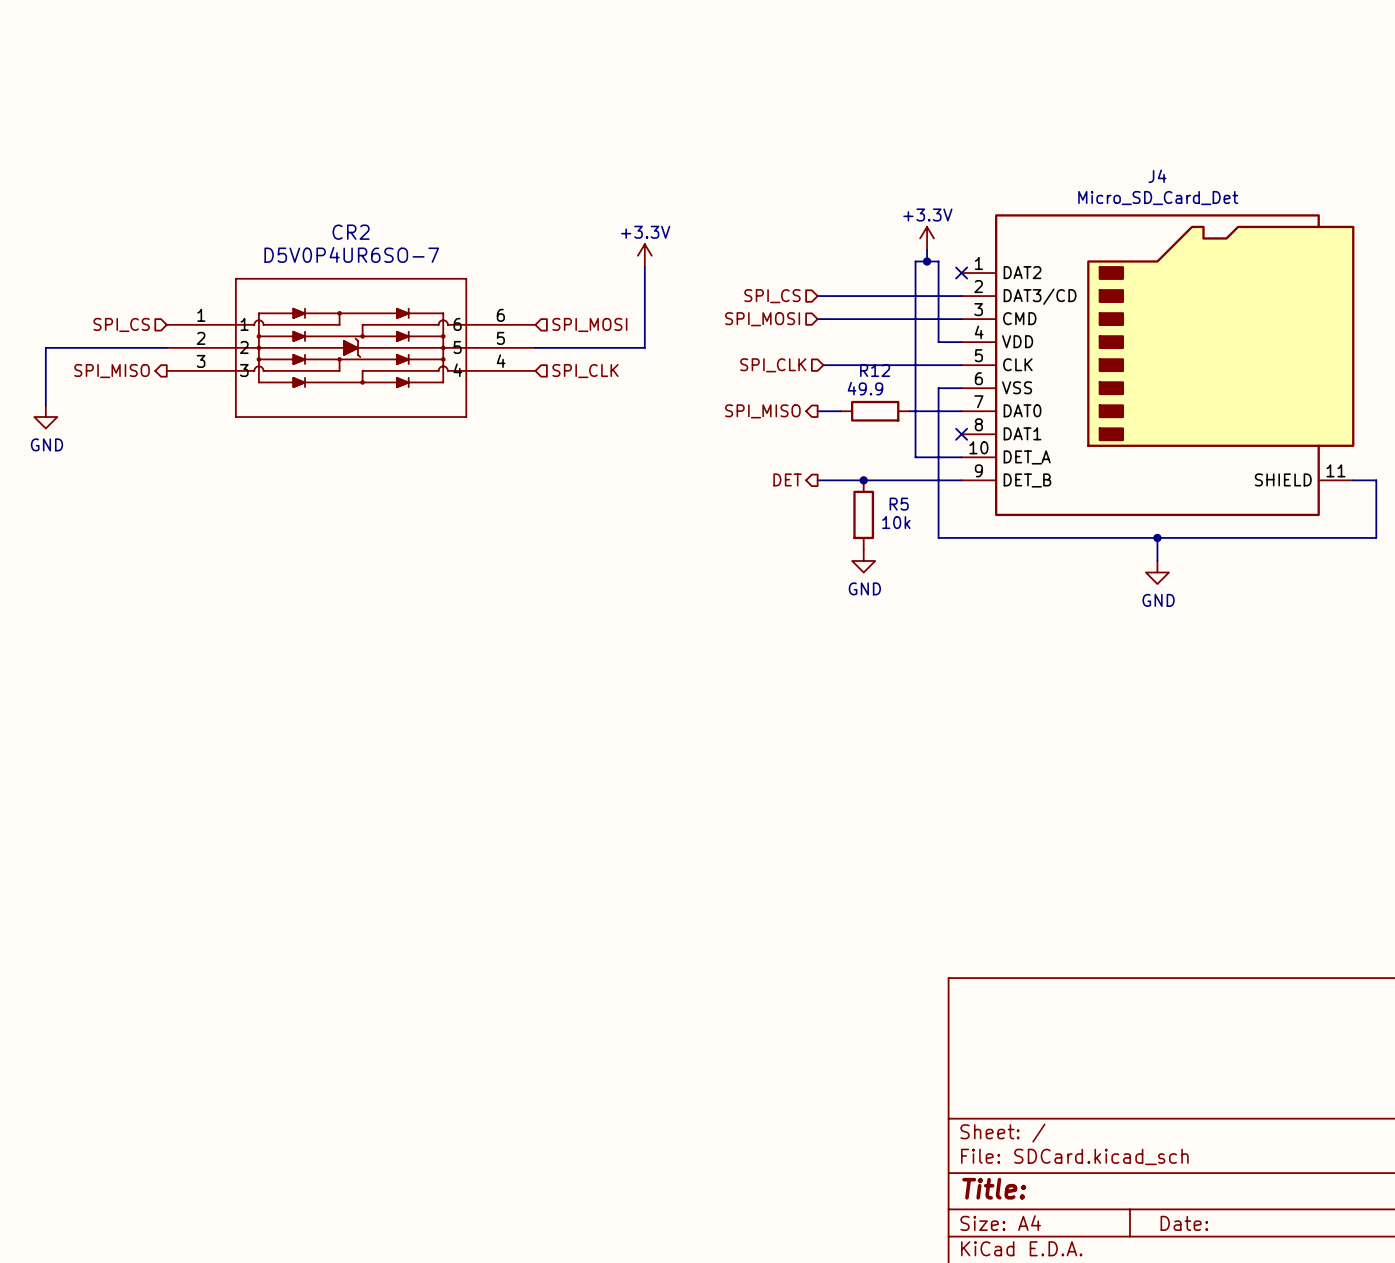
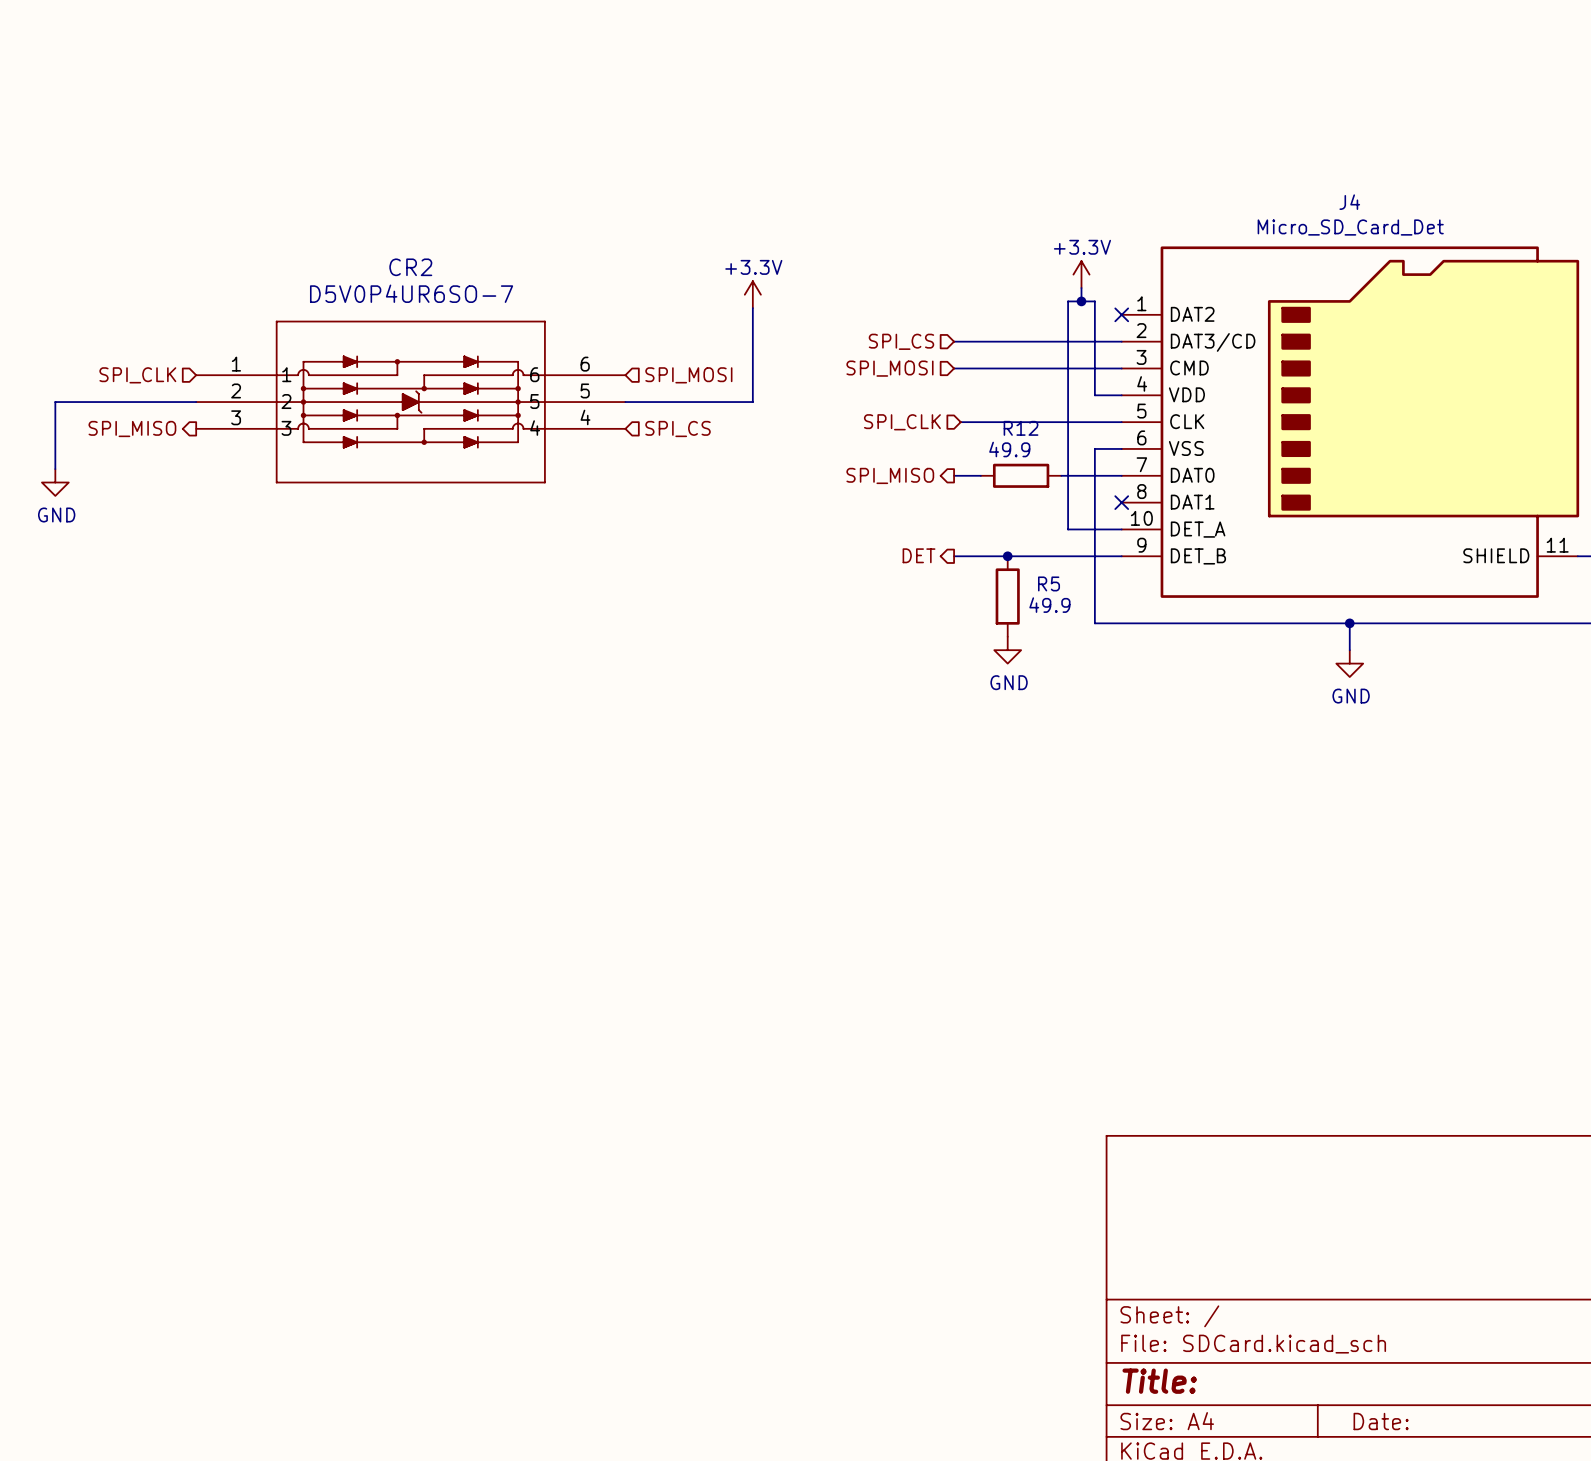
hierarchical label: SPI_CS (121, 324) -> SPI_CLK (137, 375)
hierarchical label: SPI_CLK (585, 371) -> SPI_CS (678, 428)
R5 value: 10k (896, 522) -> 49.9 (1049, 605)

